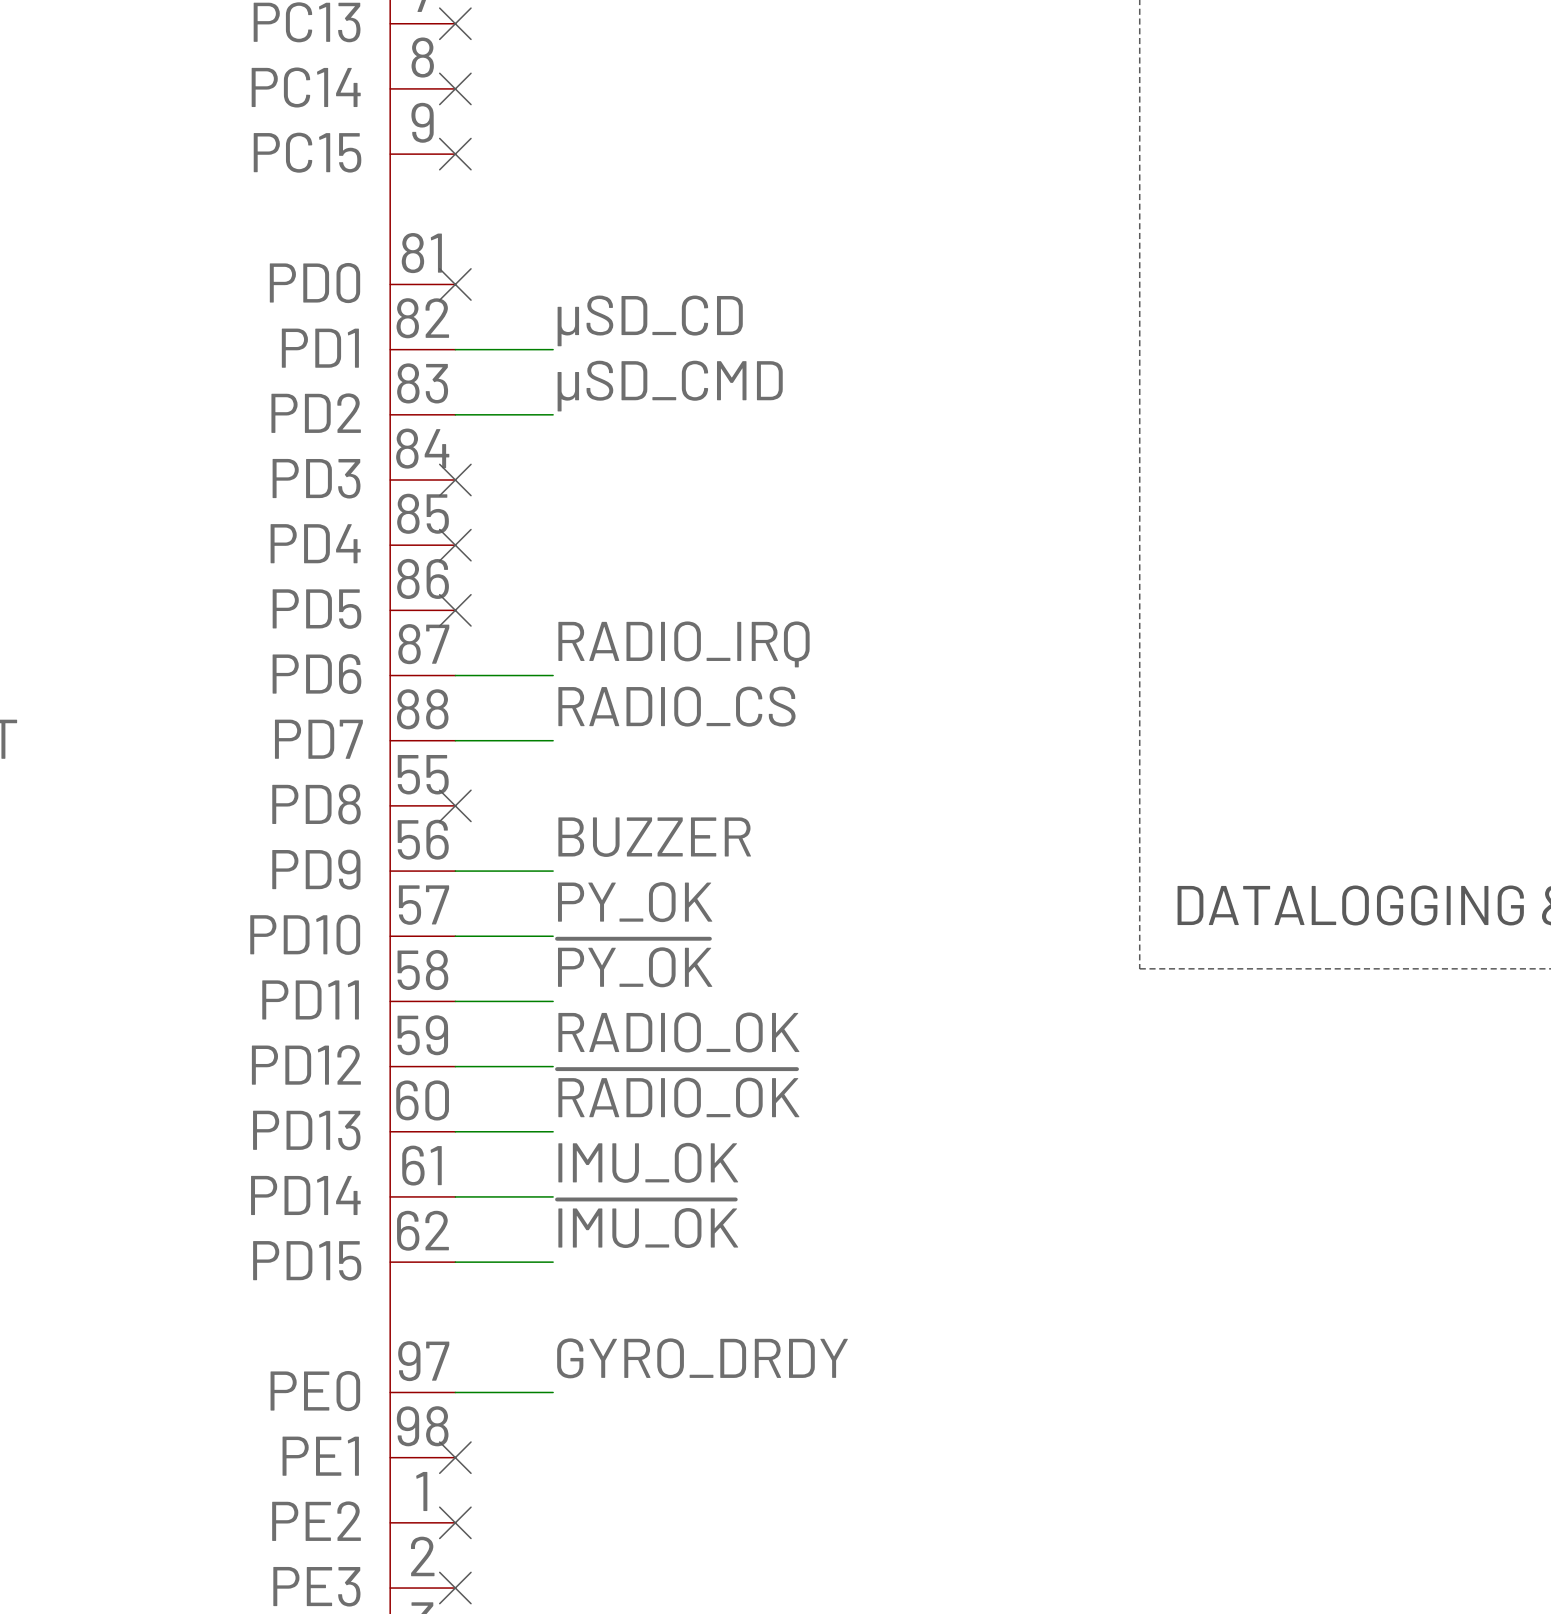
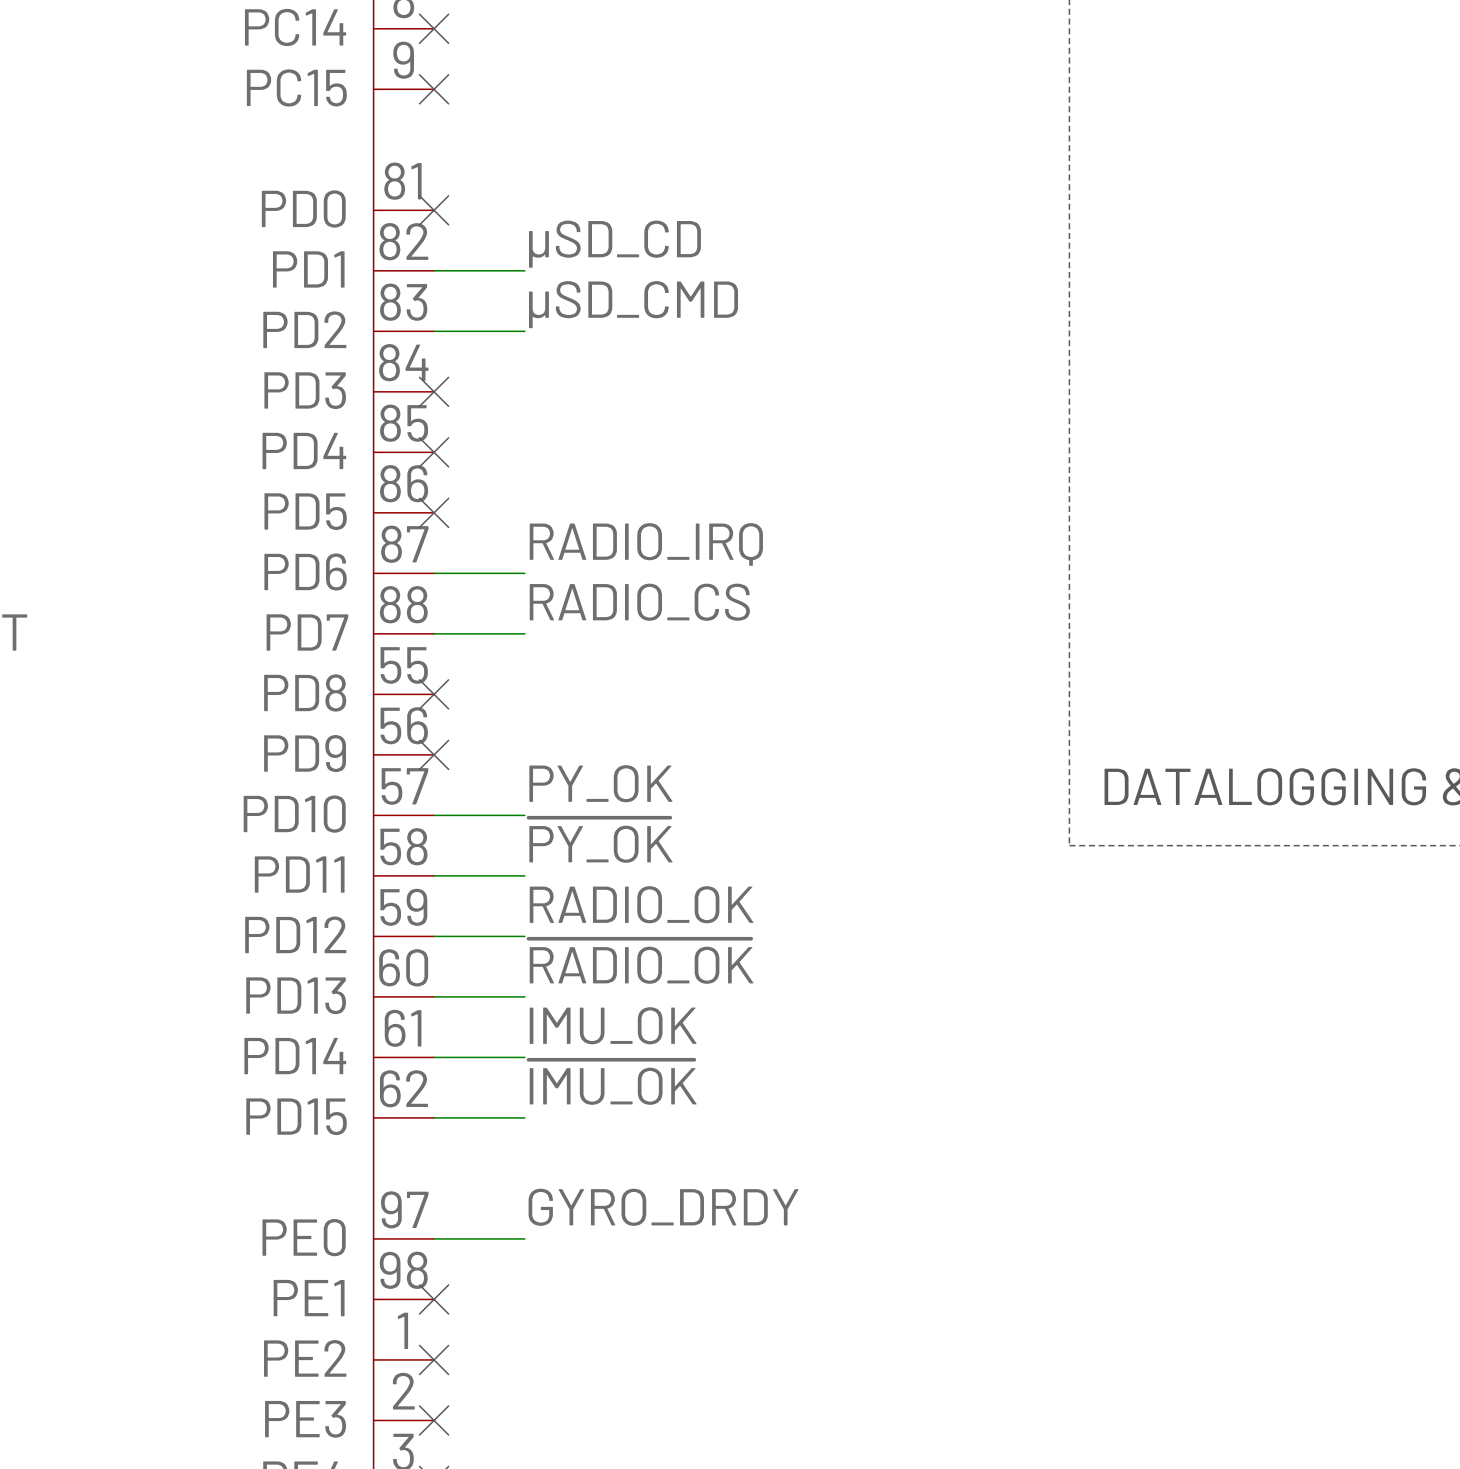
label: BUZZER (654, 837) -> none
wire: (455, 871) (553, 871) -> none
no-connect mark: none -> (434, 754)

